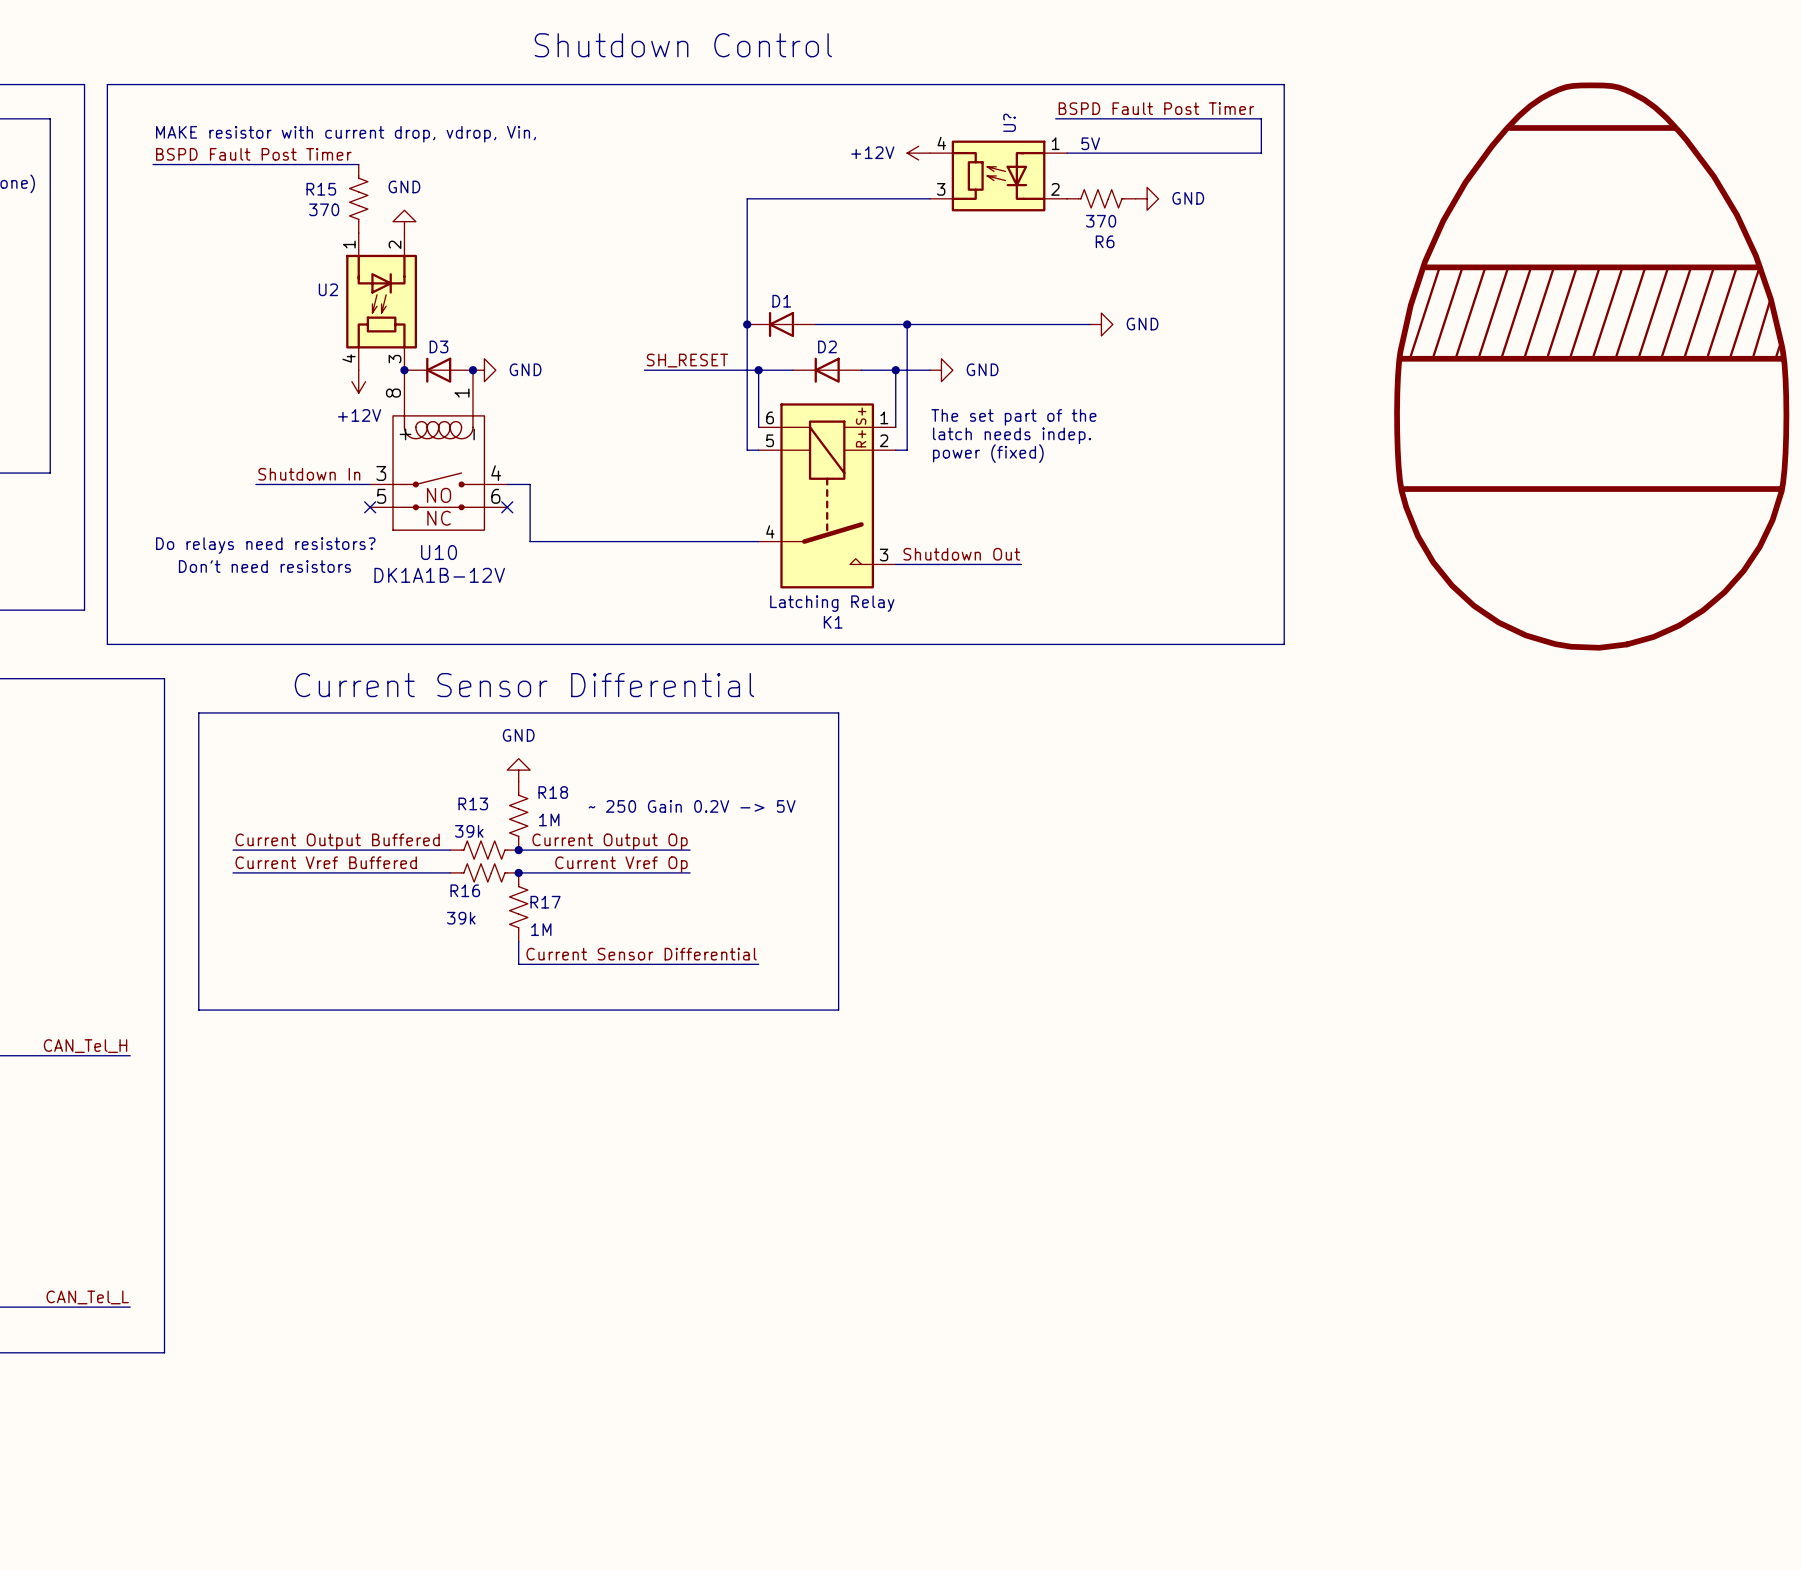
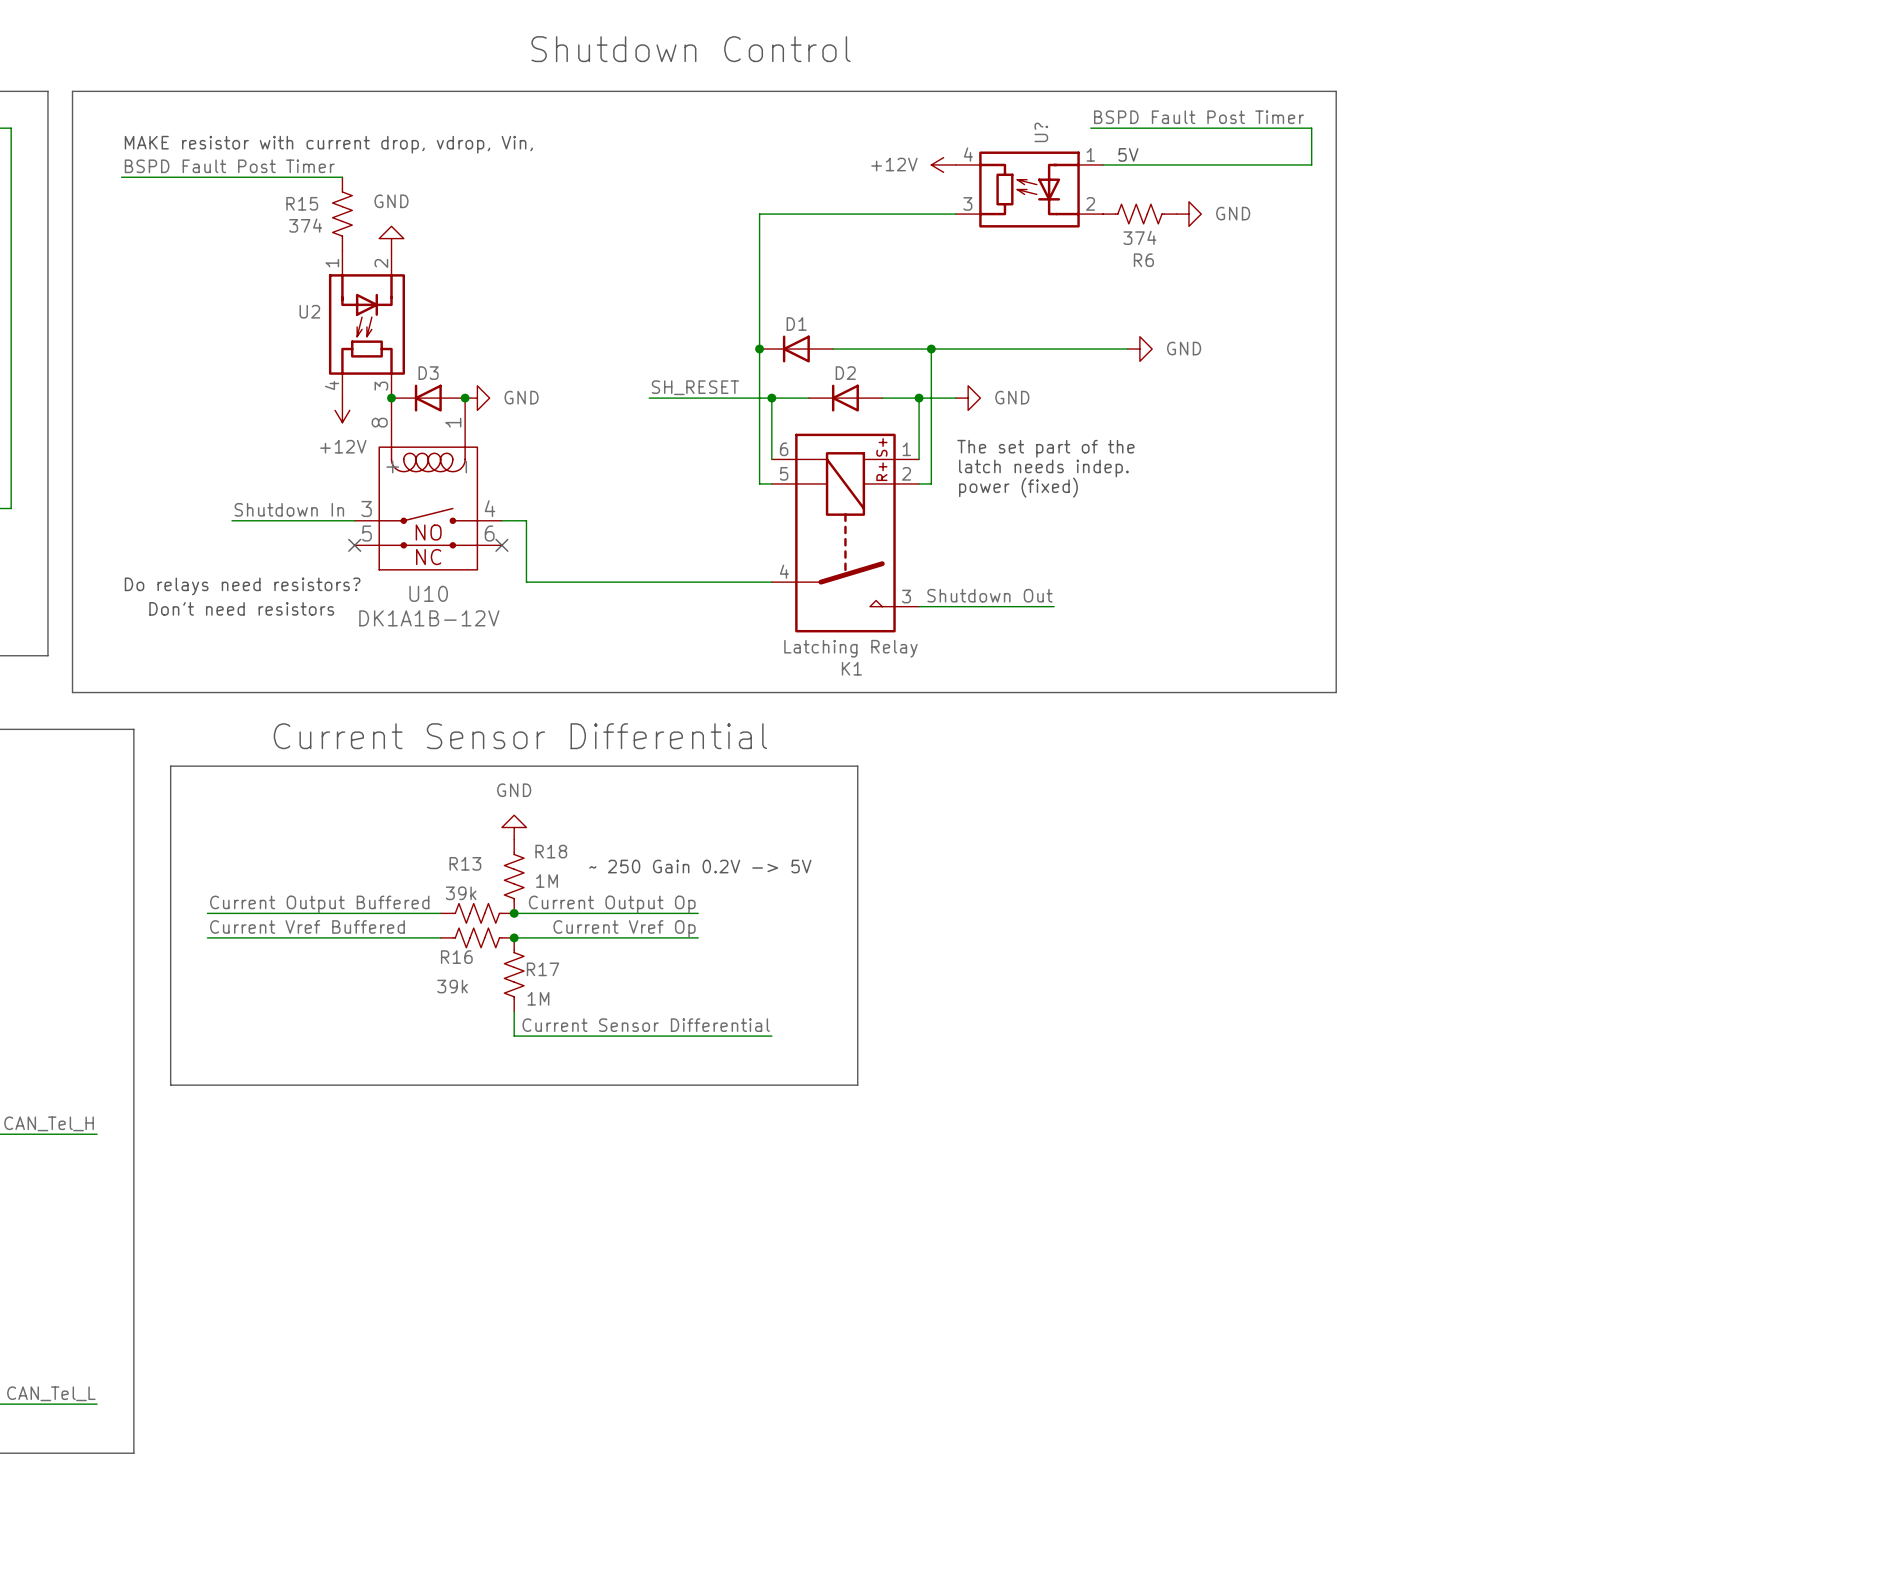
R15 value: 370 (324, 209) -> 374 (305, 225)
R6 value: 370 (1101, 221) -> 374 (1139, 237)
part: (1591, 366) -> none

